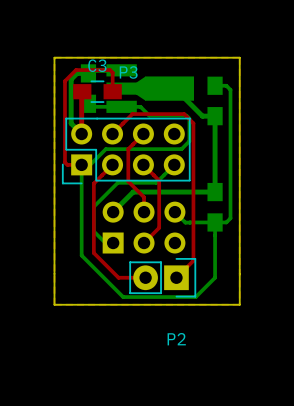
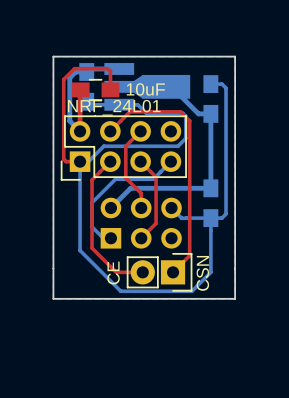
C3 name: C3 (97, 65) -> none
P3 name: P3 (128, 72) -> none
C3 value: none -> 10uF (145, 89)
P3 value: none -> NRF_24L01 (114, 107)
text: none -> CE (113, 273)
text: none -> CSN (202, 273)
P2 name: P2 (176, 339) -> none

